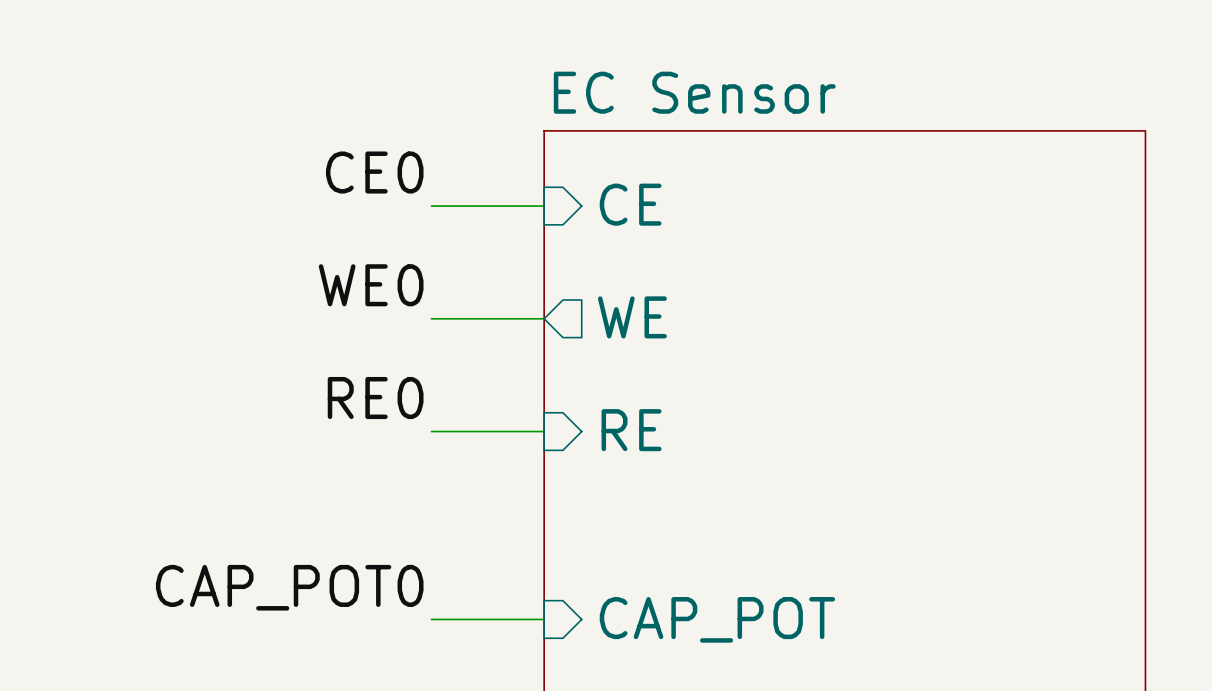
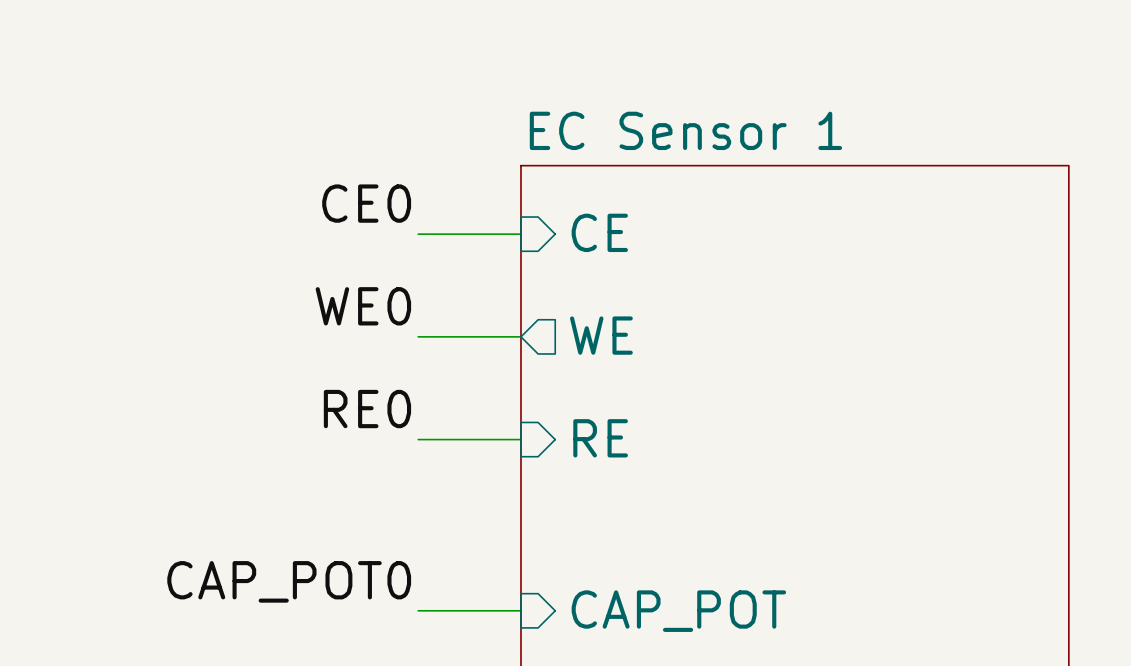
sheet EC Sensor name: EC Sensor (694, 92) -> EC Sensor 1 (685, 130)

